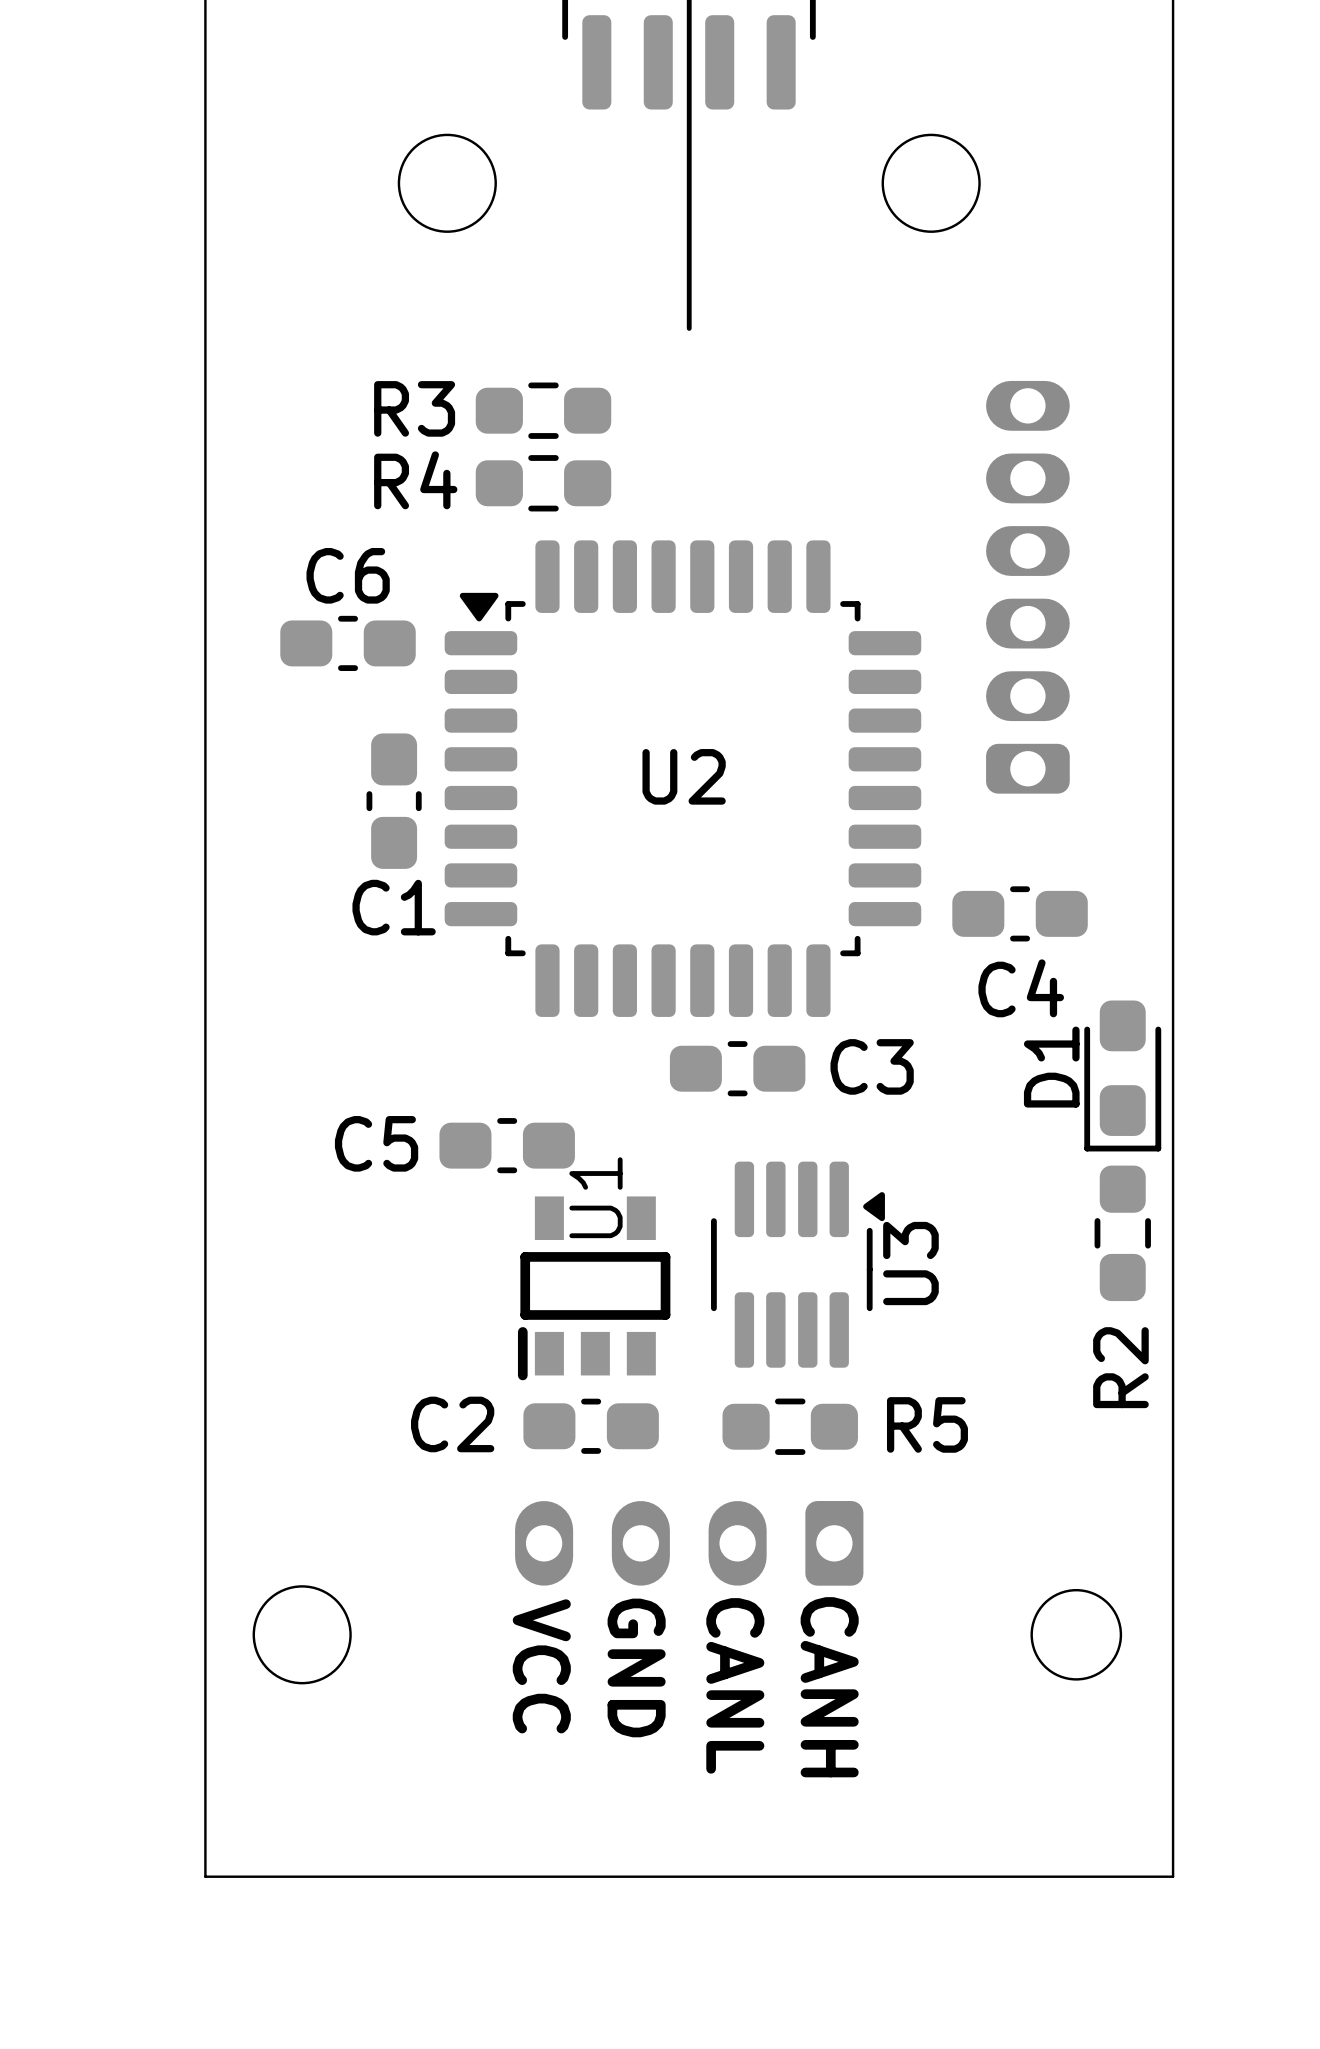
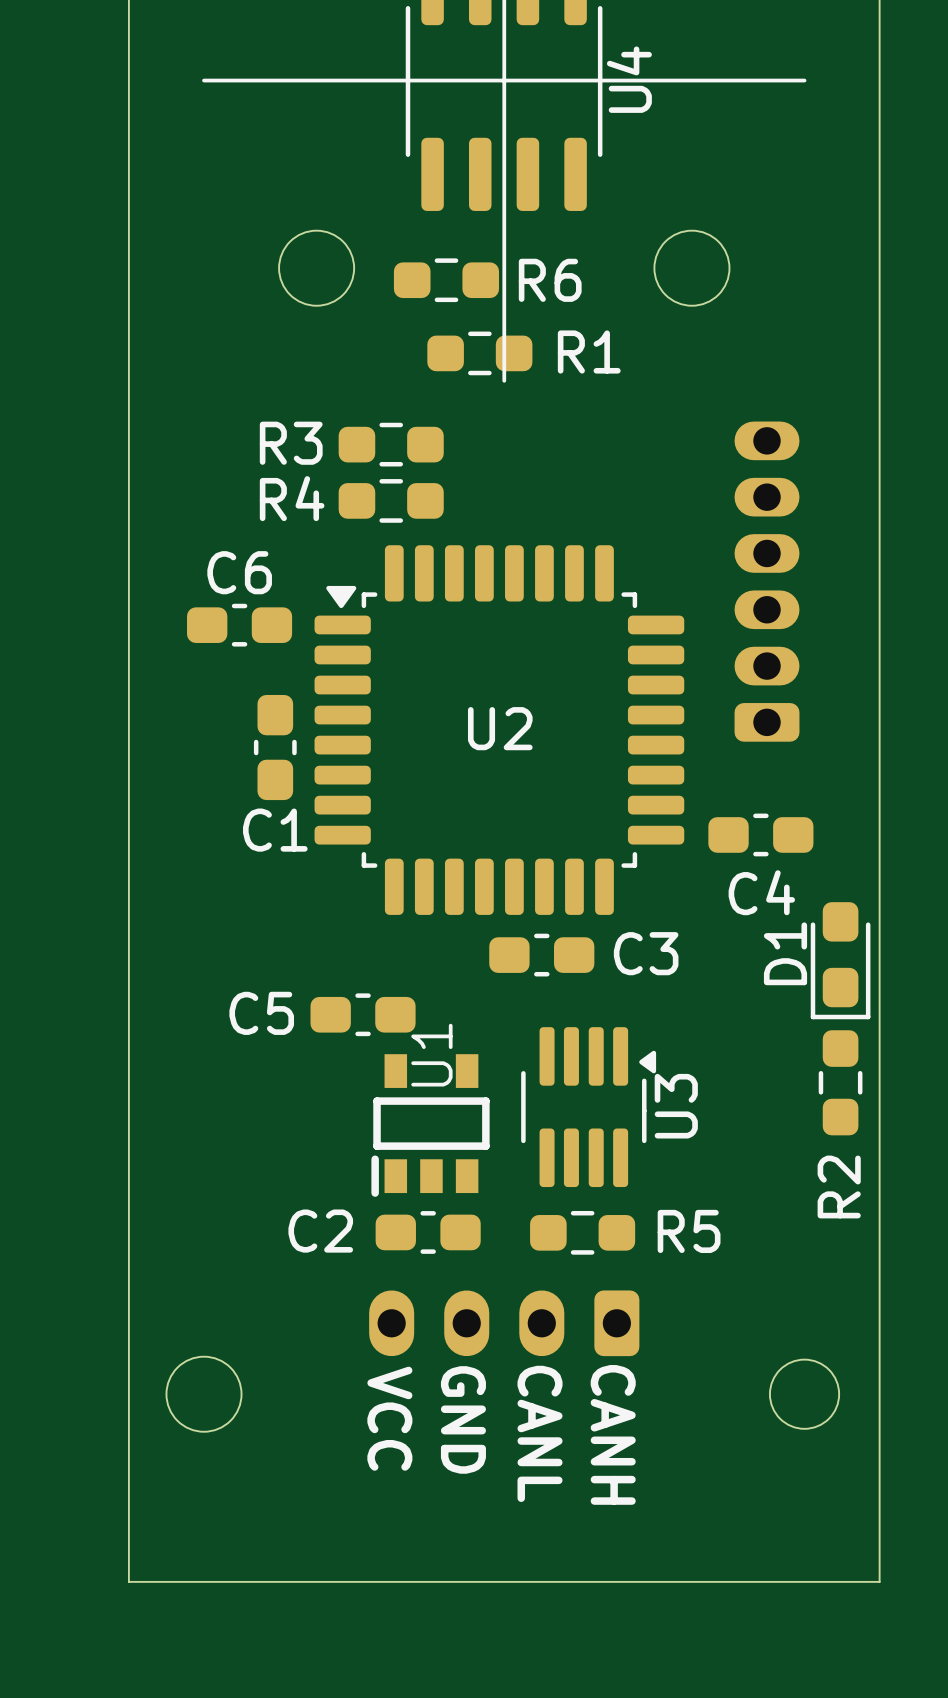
R6: none -> (446, 280)
R1: none -> (479, 353)

